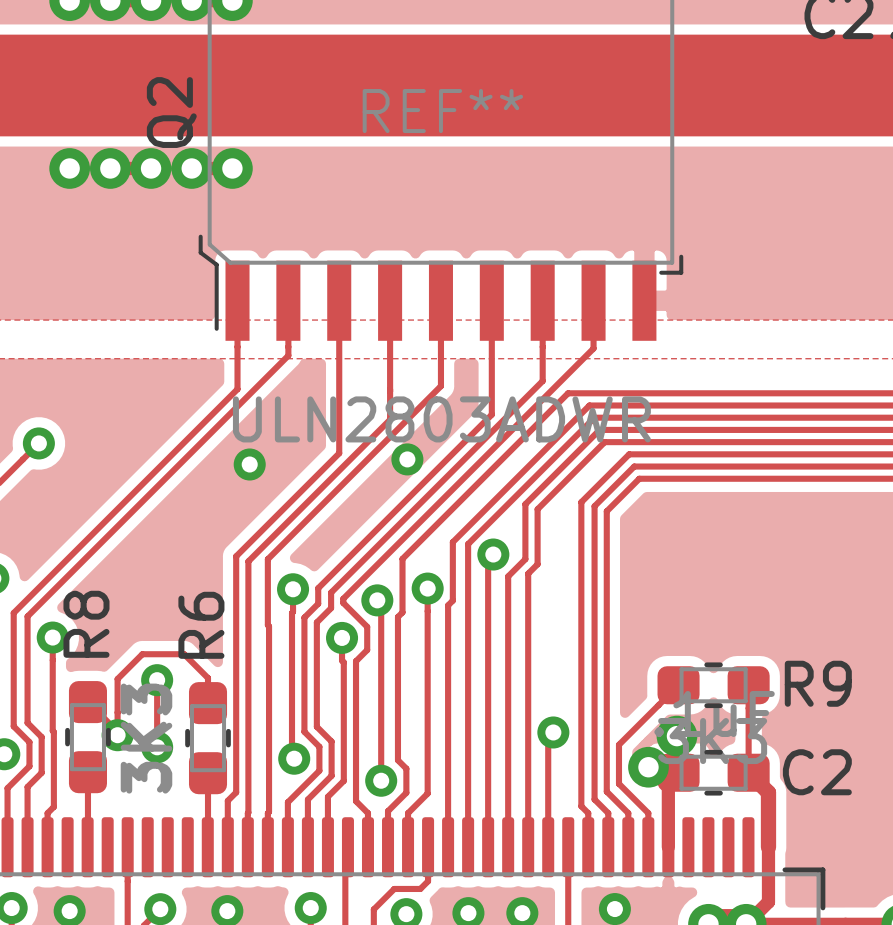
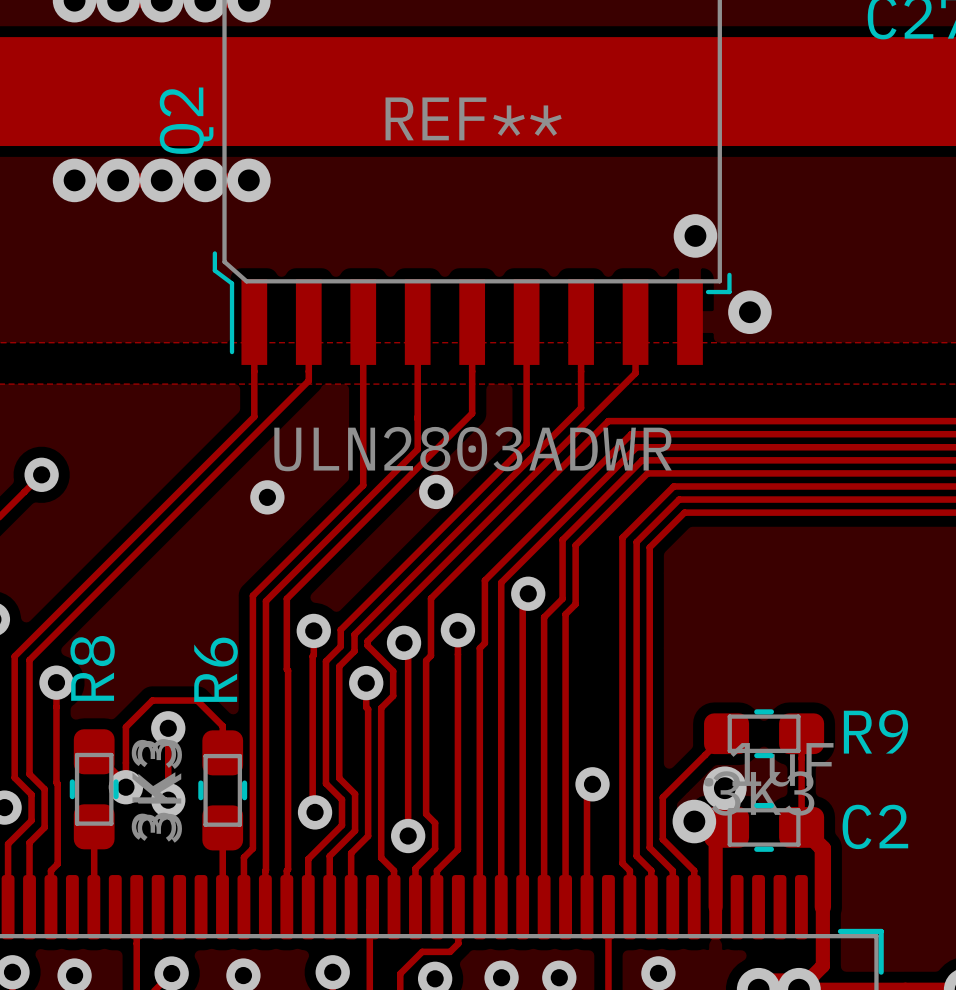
via: none -> (695, 235)
via: none -> (749, 312)

